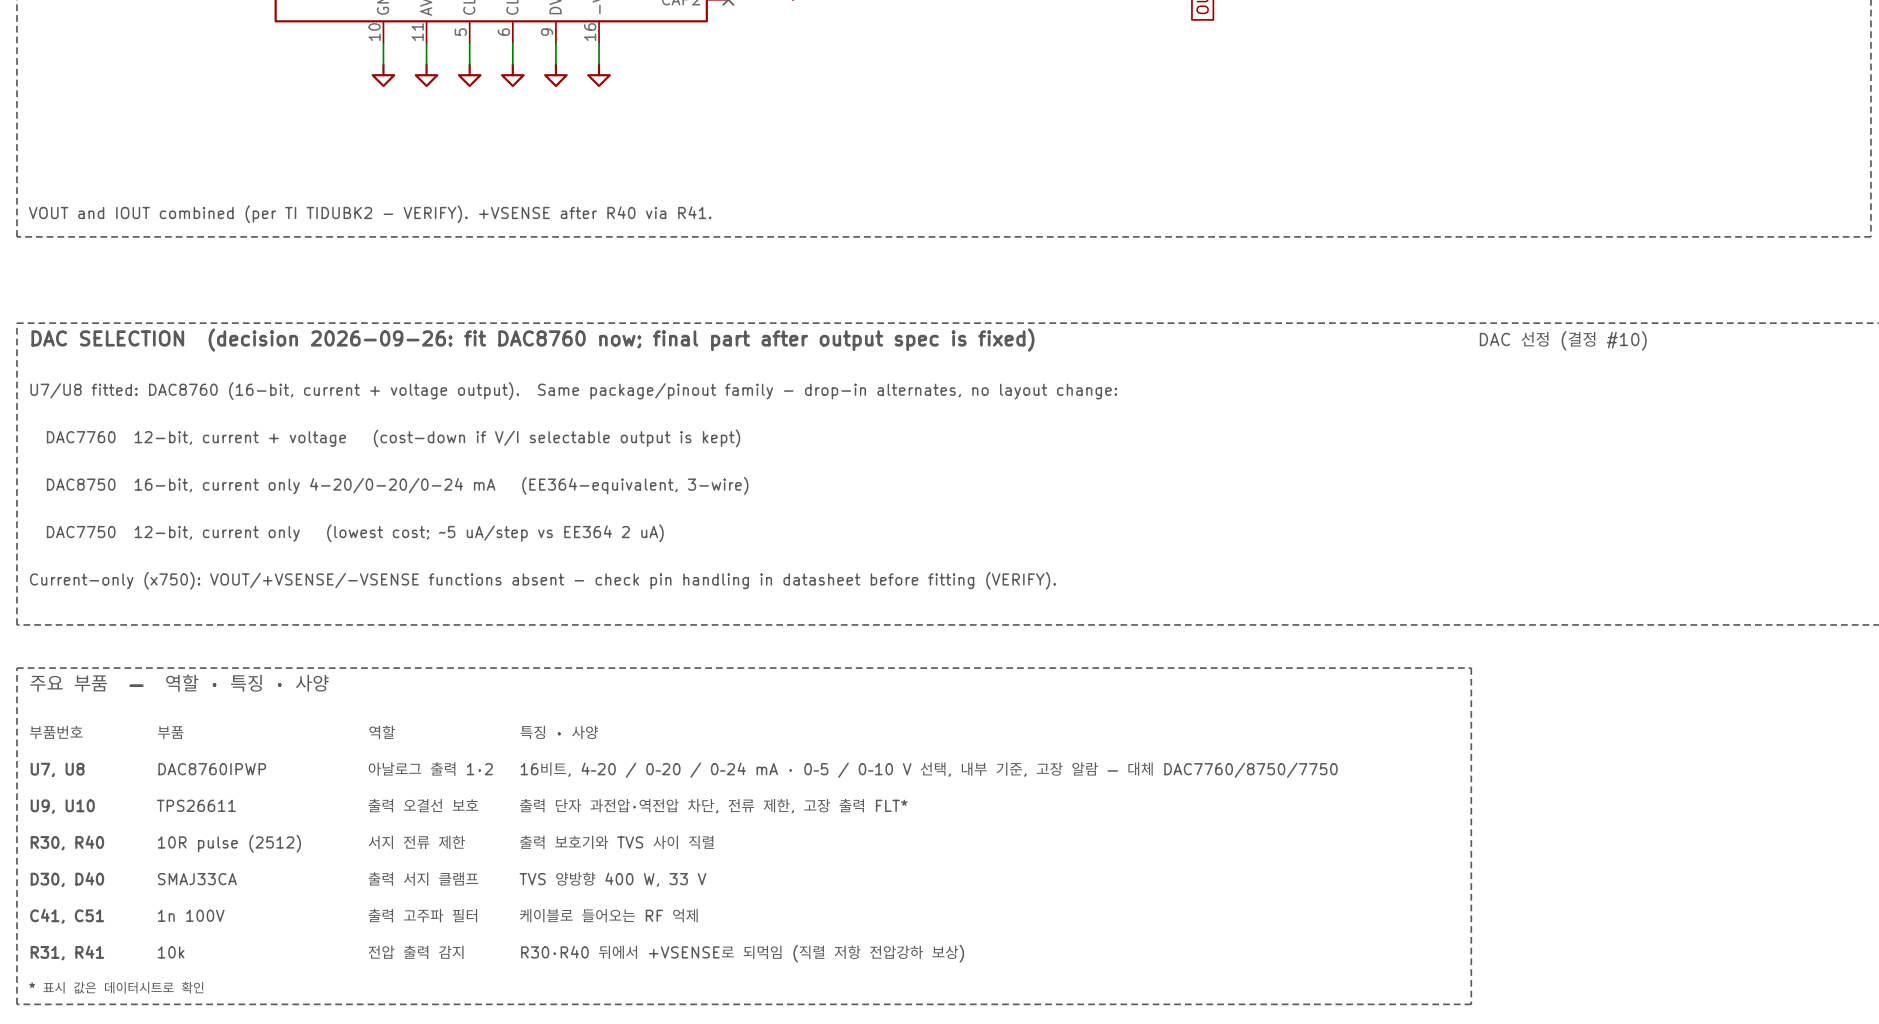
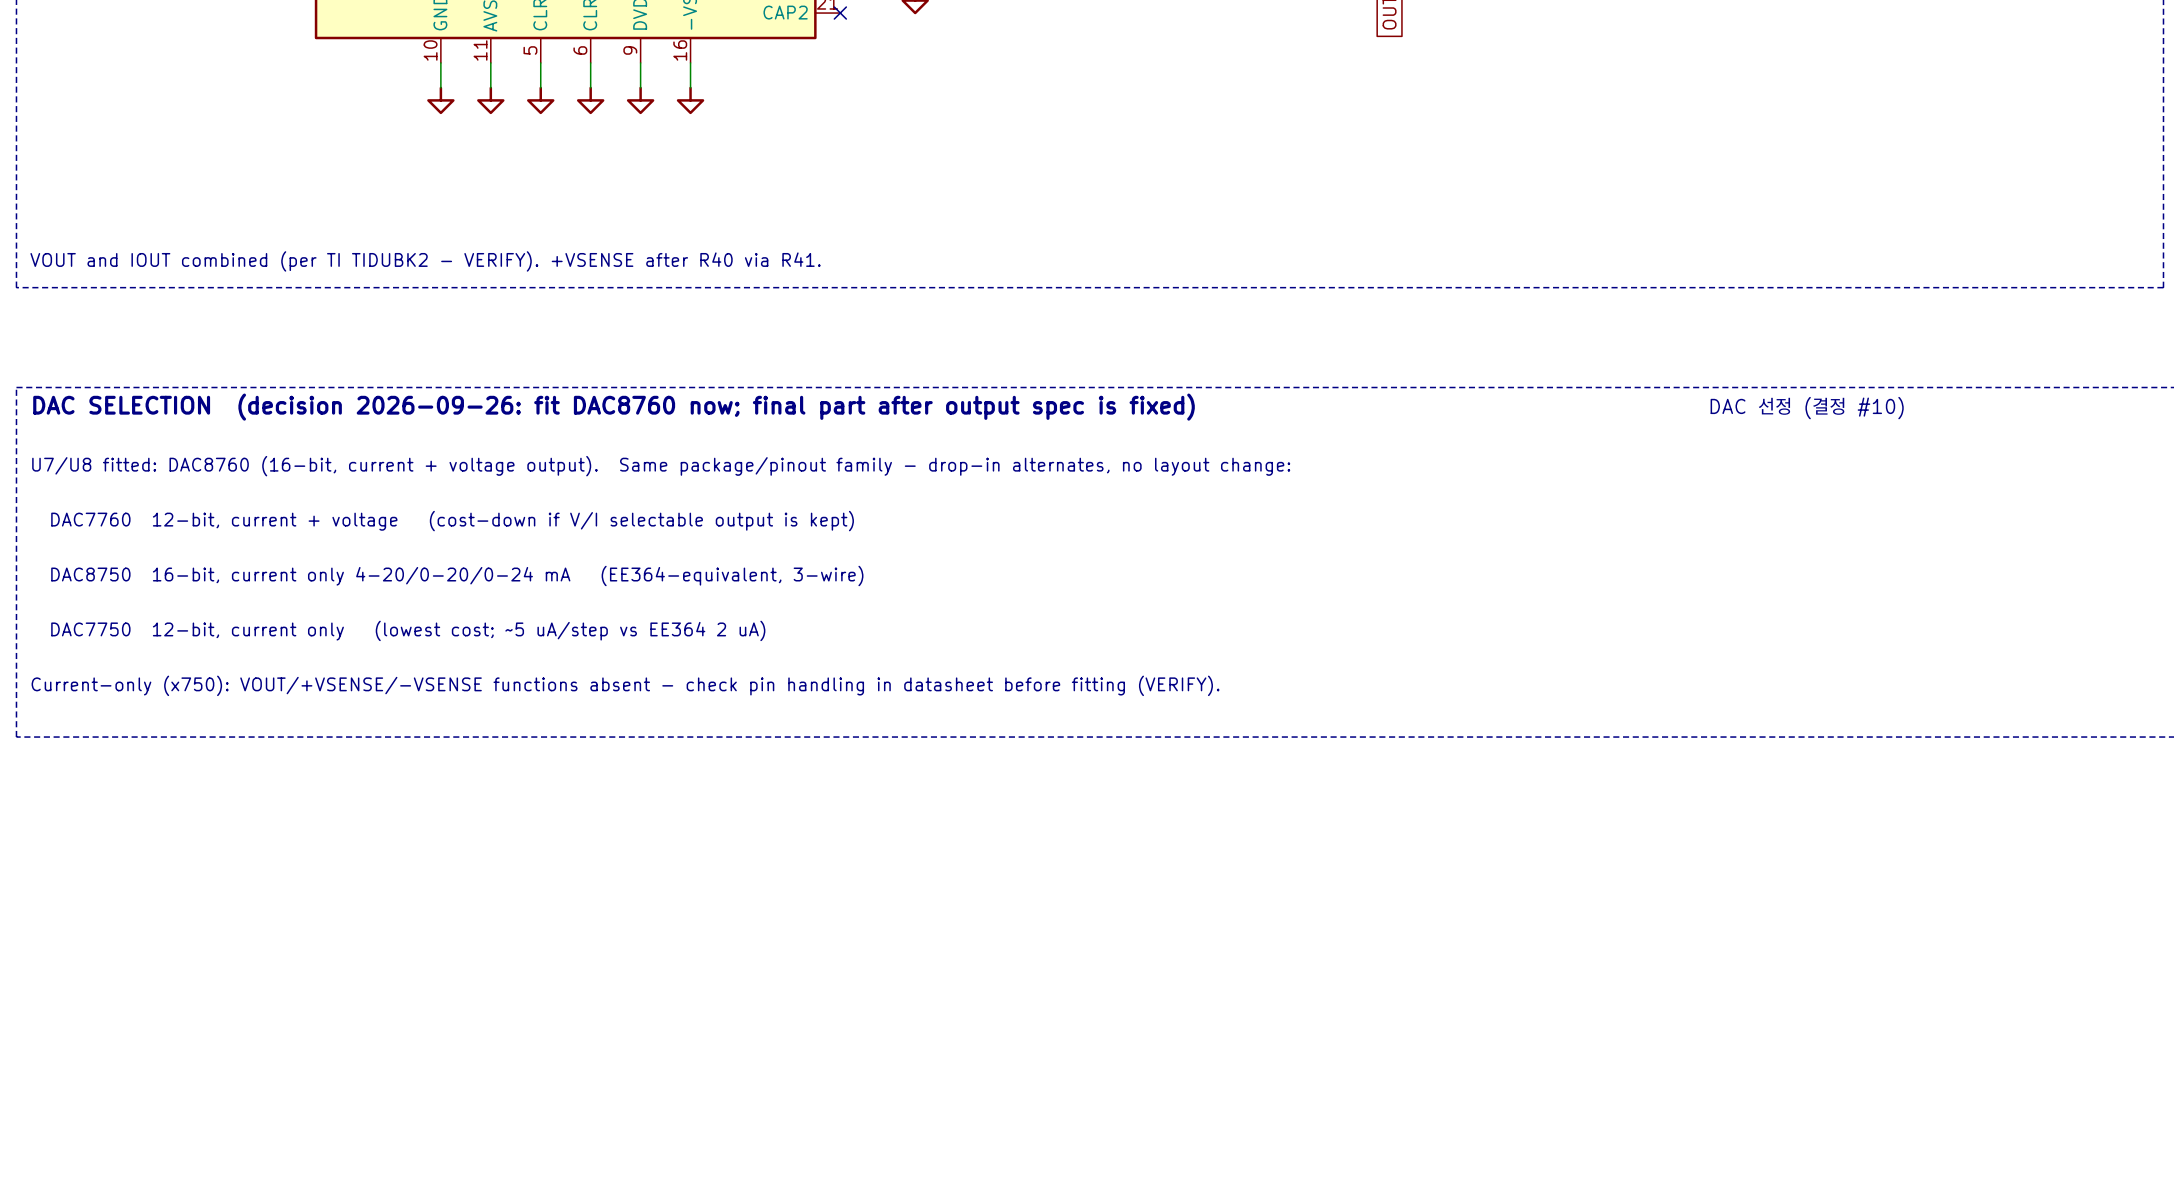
line: (16, 668) (1471, 668) (1471, 1004) (16, 1004) (16, 668) -> none
text: 주요 부품 — 역할 · 특징 · 사양 (179, 683) -> none
text: 부품번호 (56, 732) -> none
text: 부품 (170, 732) -> none
text: 역할 (382, 732) -> none
text: 특징 · 사양 (559, 732) -> none
text: U7, U8 (57, 769) -> none
text: DAC8760IPWP (212, 769) -> none
text: 아날로그 출력 1·2 (430, 769) -> none
text: 16비트, 4–20 / 0–20 / 0–24 mA · 0–5 / 0–10 V 선택, 내부 기준, 고장 알람 — 대체 DAC7760/8750/7750 (929, 769) -> none
text: TPS26611 (196, 805) -> none
text: 출력 오결선 보호 (423, 805) -> none
text: 출력 단자 과전압·역전압 차단, 전류 제한, 고장 출력 FLT* (713, 805) -> none
text: U9, U10 (62, 806) -> none
text: R30, R40 (67, 842) -> none
text: 서지 전류 제한 (416, 842) -> none
text: 출력 보호기와 TVS 사이 직렬 (616, 842) -> none
text: 10R pulse (2512) (229, 843) -> none
text: 출력 서지 클램프 (423, 878) -> none
text: D30, D40 (67, 879) -> none
text: SMAJ33CA (197, 879) -> none
text: TVS 양방향 400 W, 33 V (612, 879) -> none
text: 1n 100V (191, 915) -> none
text: 출력 고주파 필터 (422, 915) -> none
text: 케이블로 들어오는 RF 억제 (608, 915) -> none
text: C41, C51 (67, 916) -> none
text: R31, R41 (67, 952) -> none
text: 10k (171, 952) -> none
text: 전압 출력 감지 (416, 952) -> none
text: R30·R40 뒤에서 +VSENSE로 되먹임 (직렬 저항 전압강하 보상) (742, 953) -> none
text: * 표시 값은 데이터시트로 확인 (116, 987) -> none

